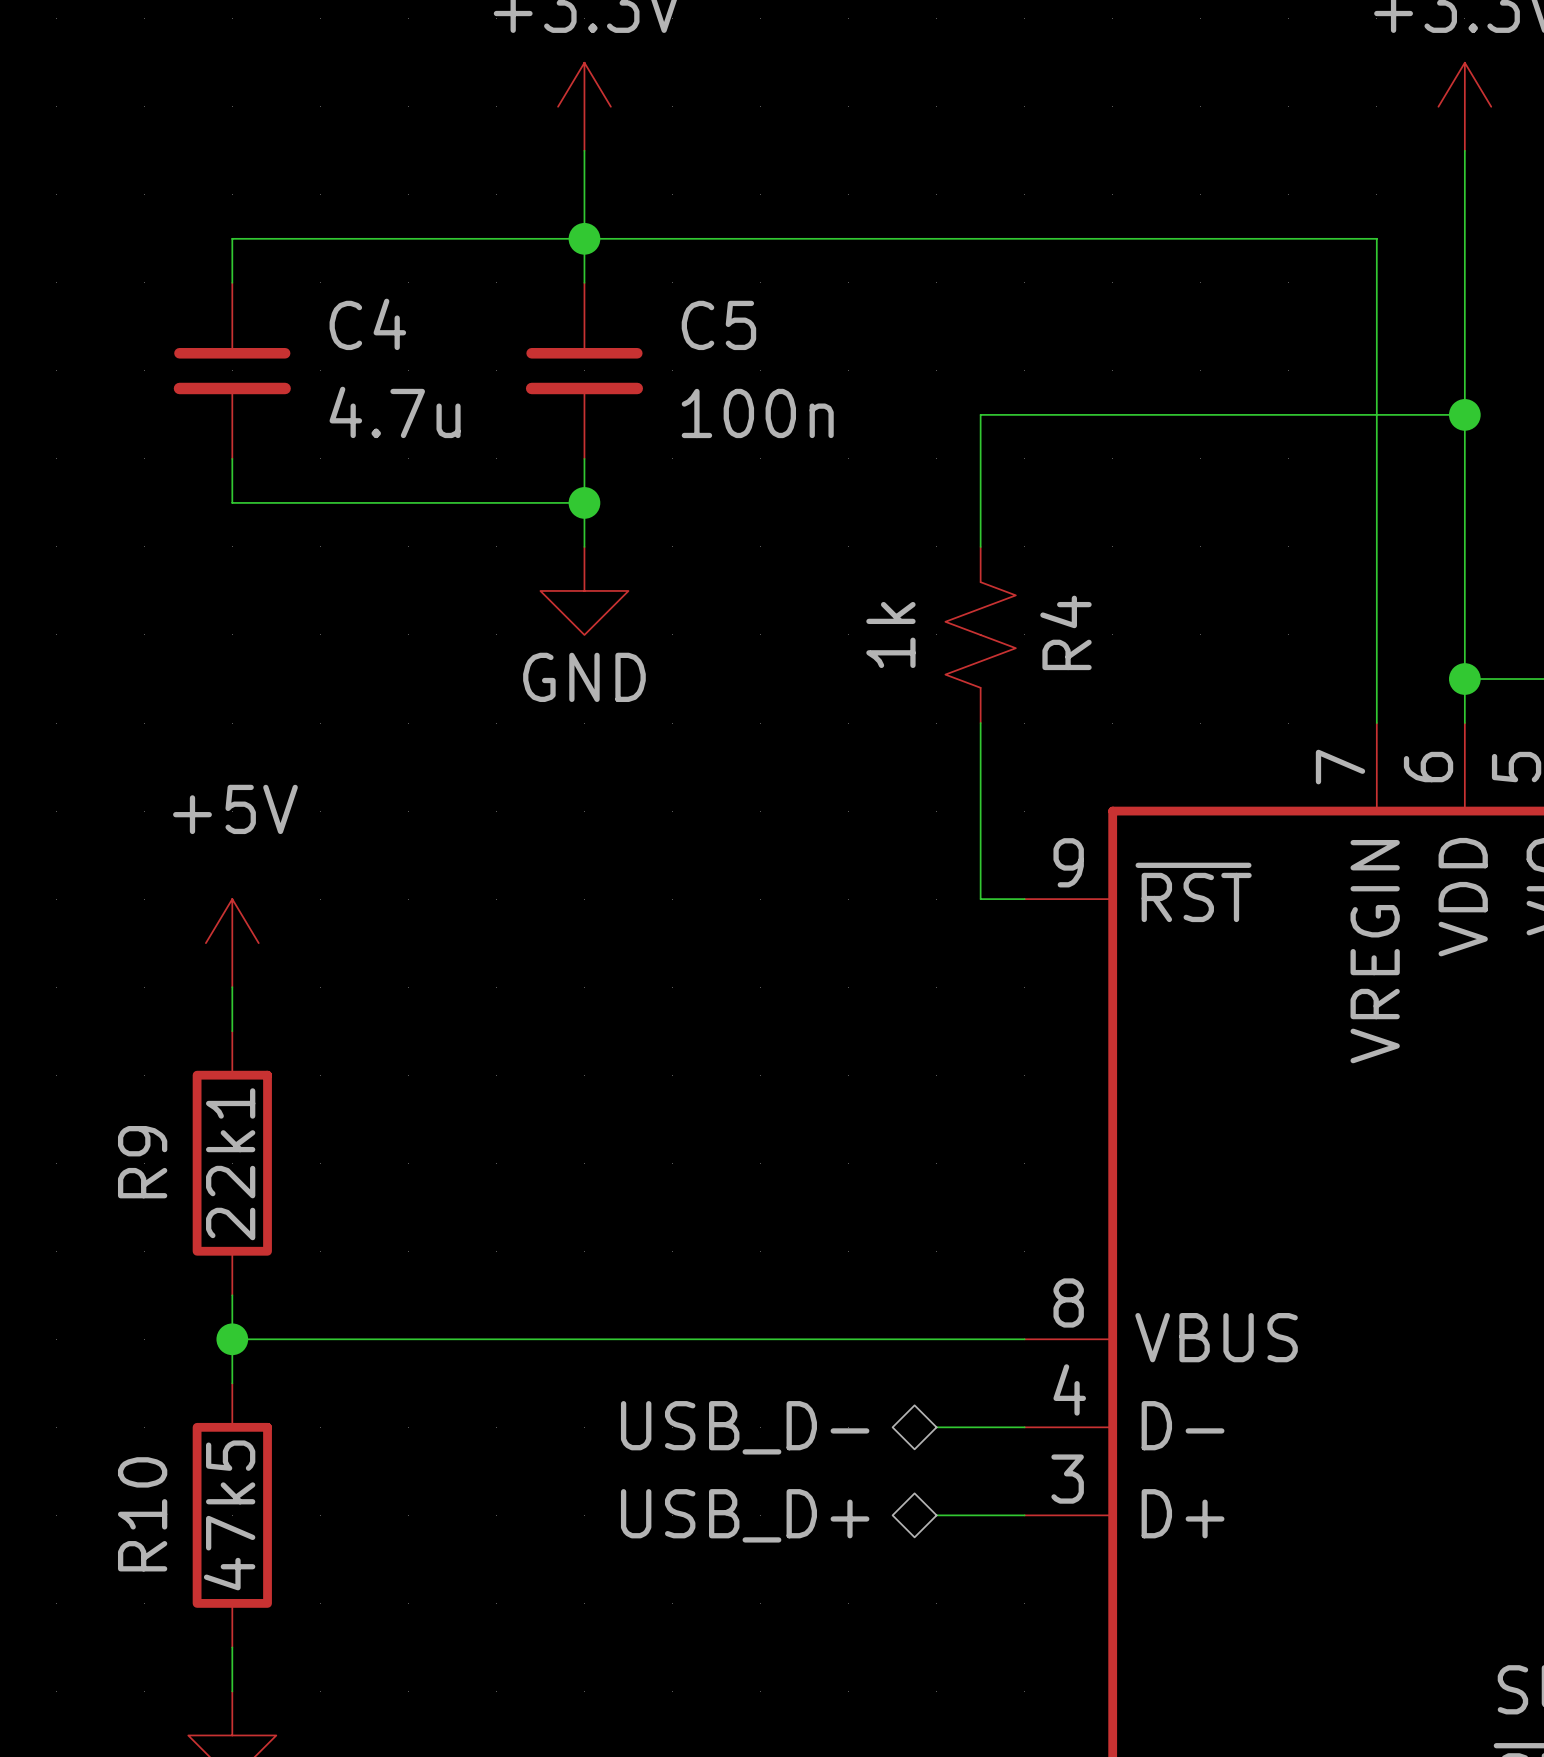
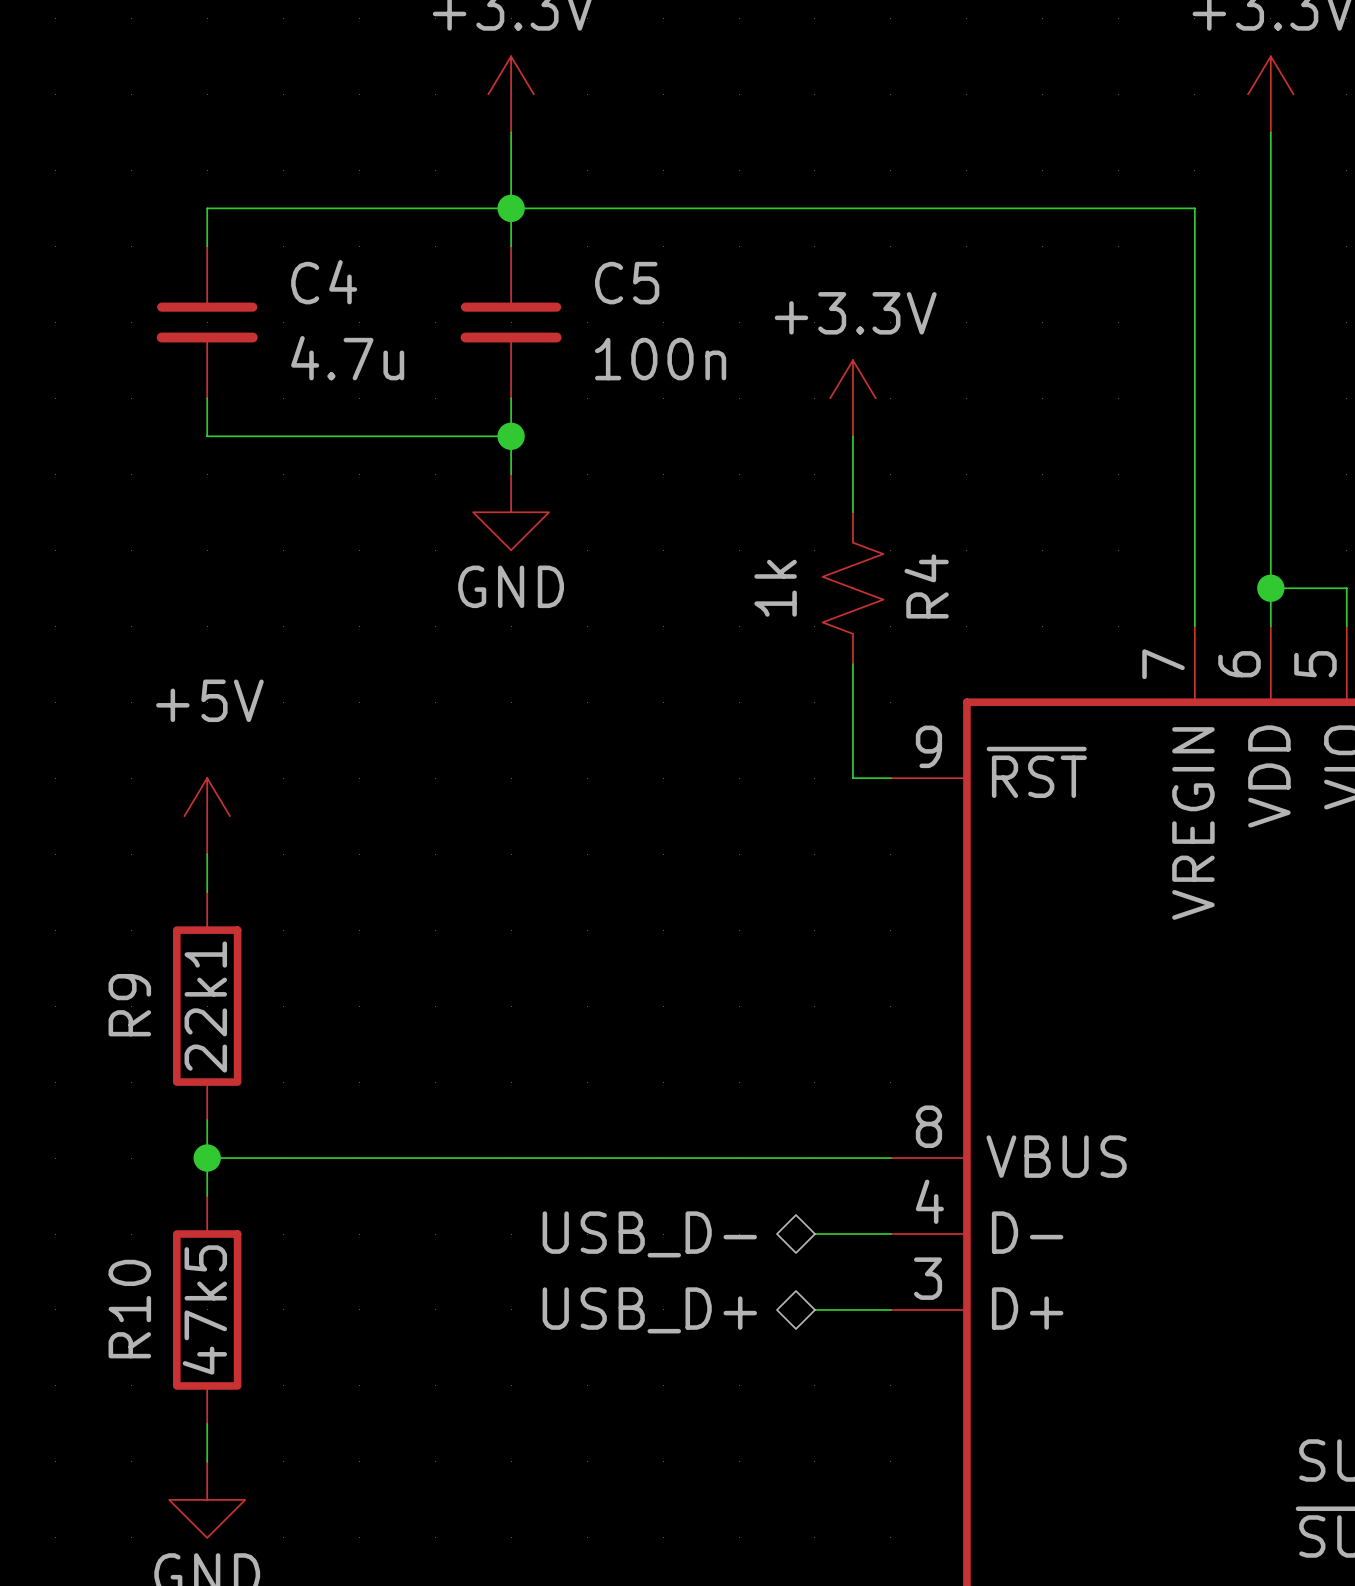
wire: (1464, 414) (980, 414) (980, 502) -> none
junction: (1464, 414) -> none
power symbol: none -> +3.3V (852, 398)
R4 position: (980, 634) -> (852, 588)

